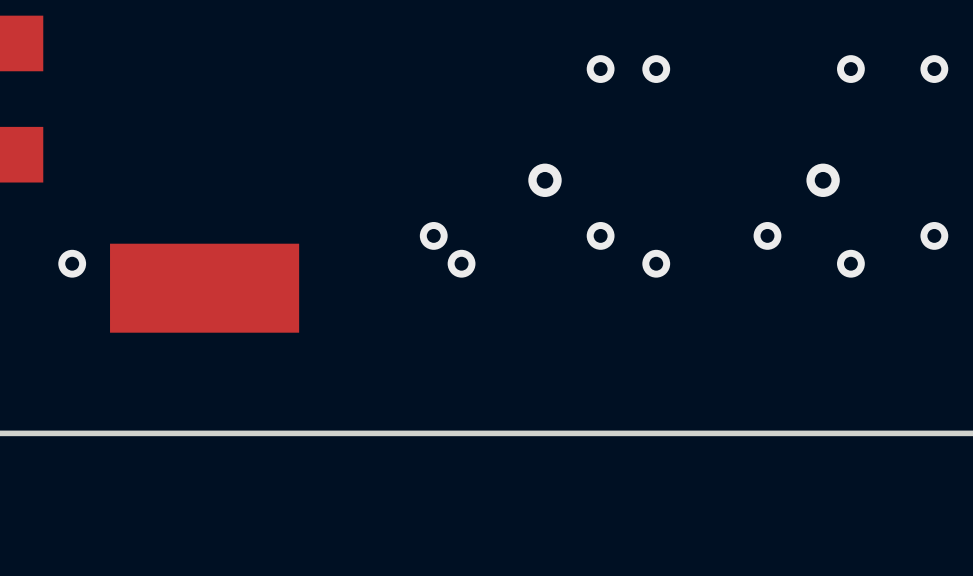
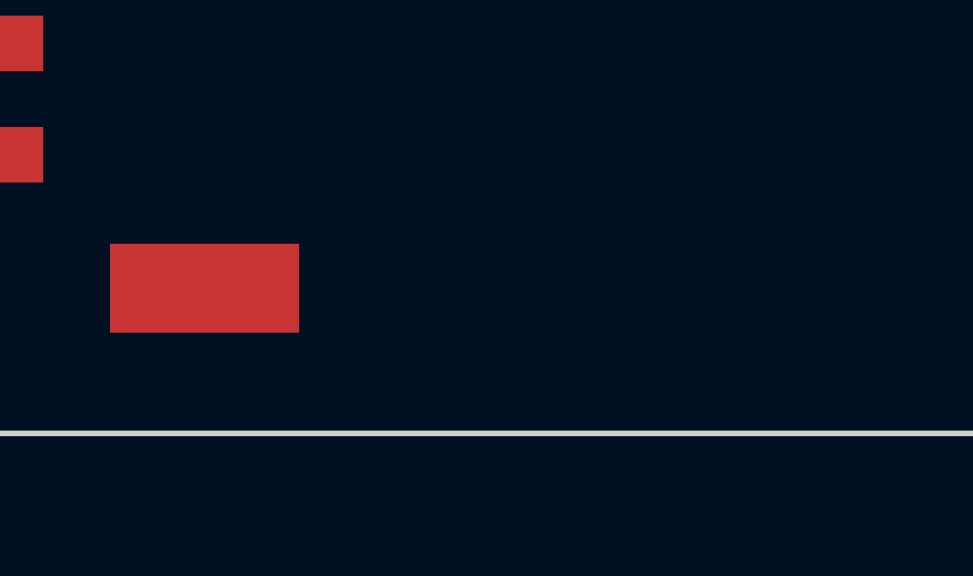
via: (600, 69) -> none
via: (656, 69) -> none
via: (850, 69) -> none
via: (934, 69) -> none
via: (544, 180) -> none
via: (823, 180) -> none
via: (433, 235) -> none
via: (600, 235) -> none
via: (767, 235) -> none
via: (934, 235) -> none
via: (72, 263) -> none
via: (461, 263) -> none
via: (656, 263) -> none
via: (850, 263) -> none

